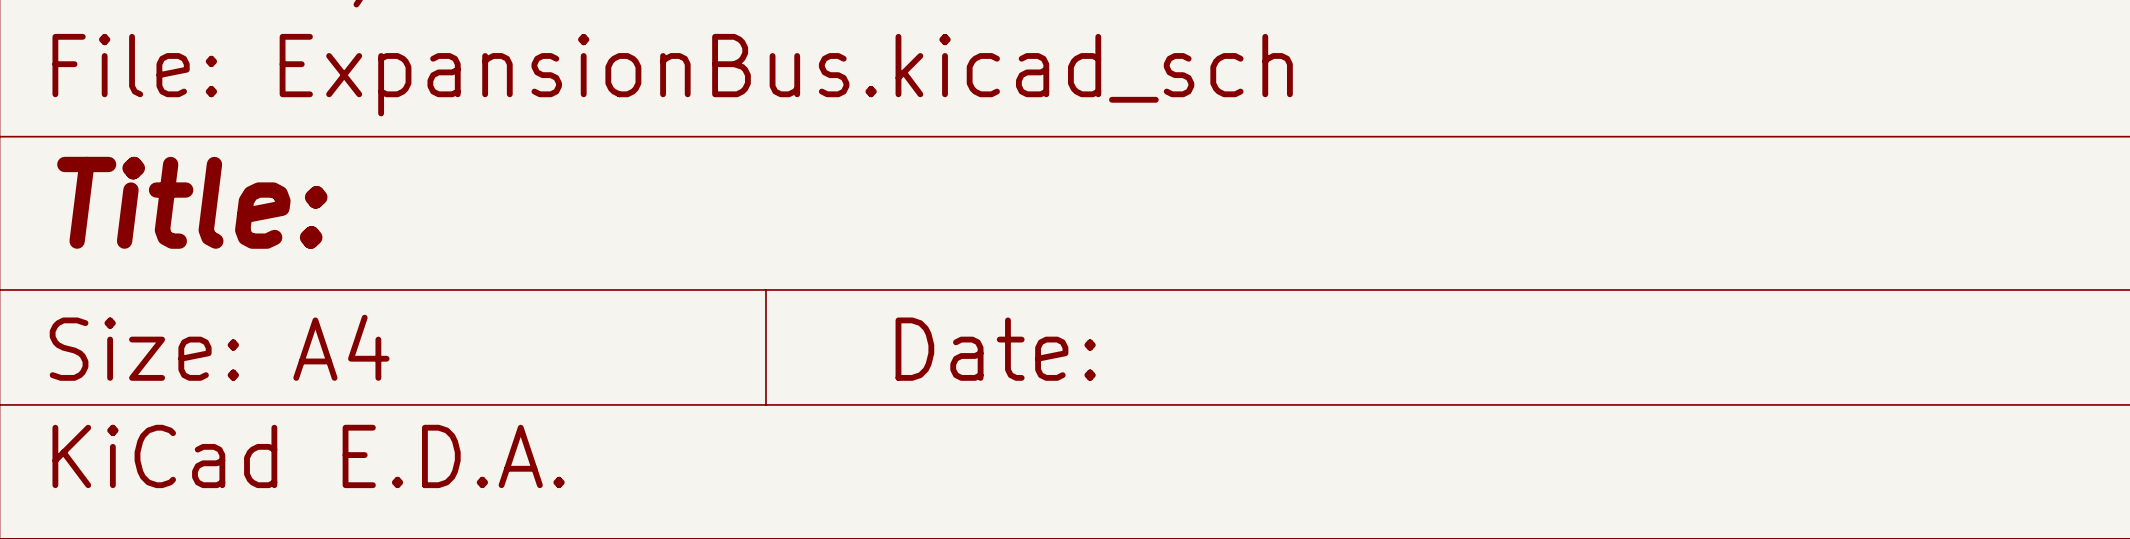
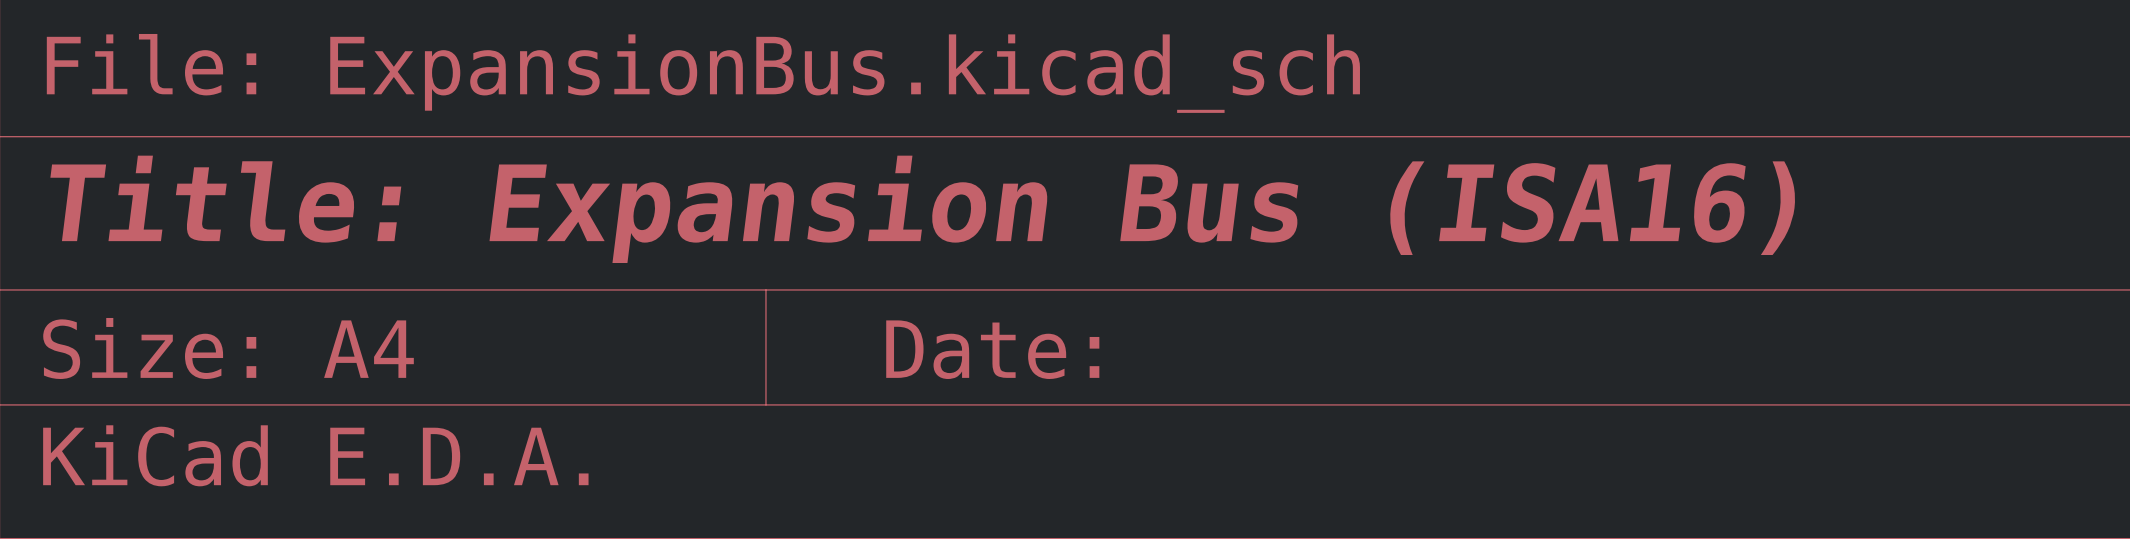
title block: Title: (192, 202) -> Title: Expansion Bus (ISA16) (923, 209)

